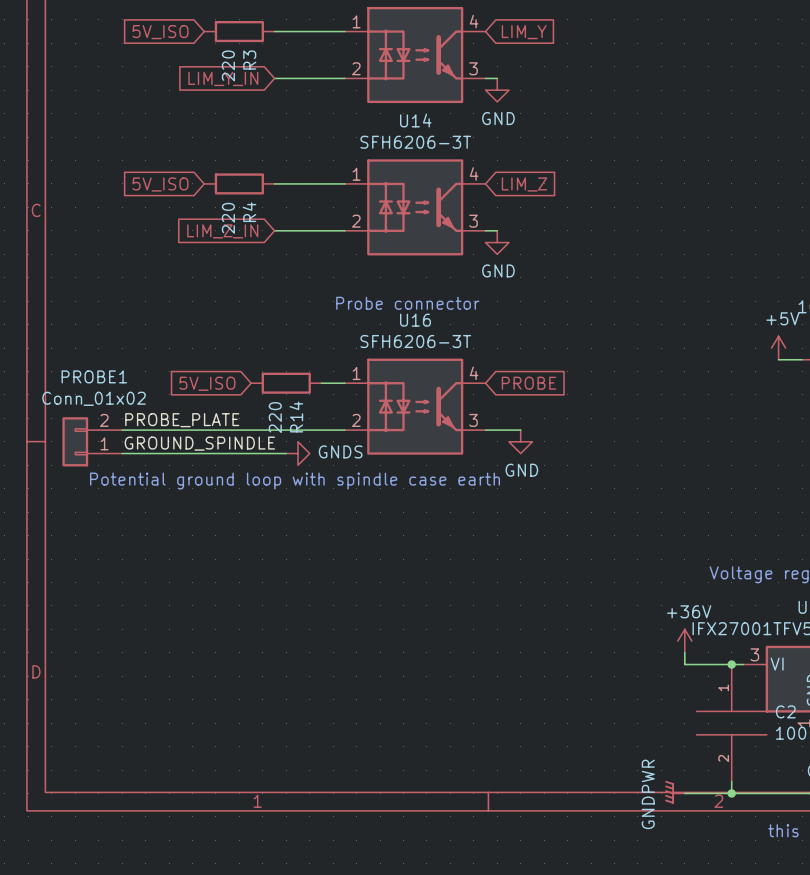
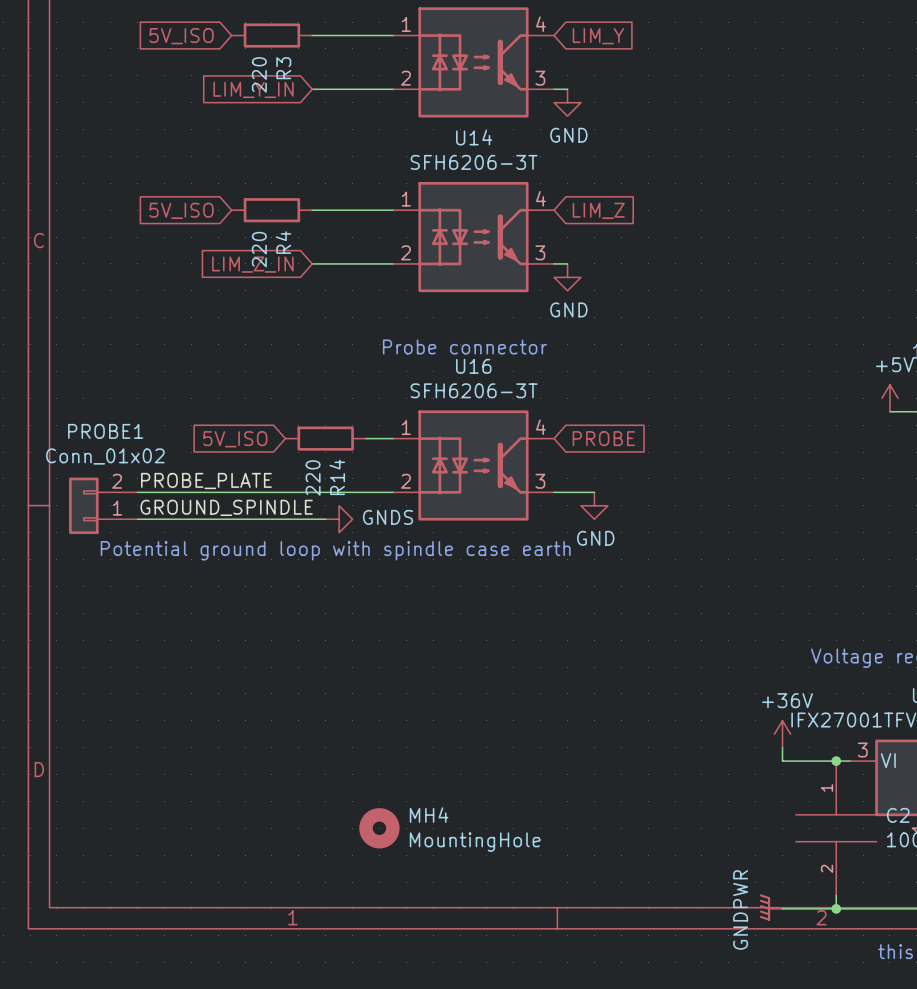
MH4: none -> MountingHole (379, 828)

